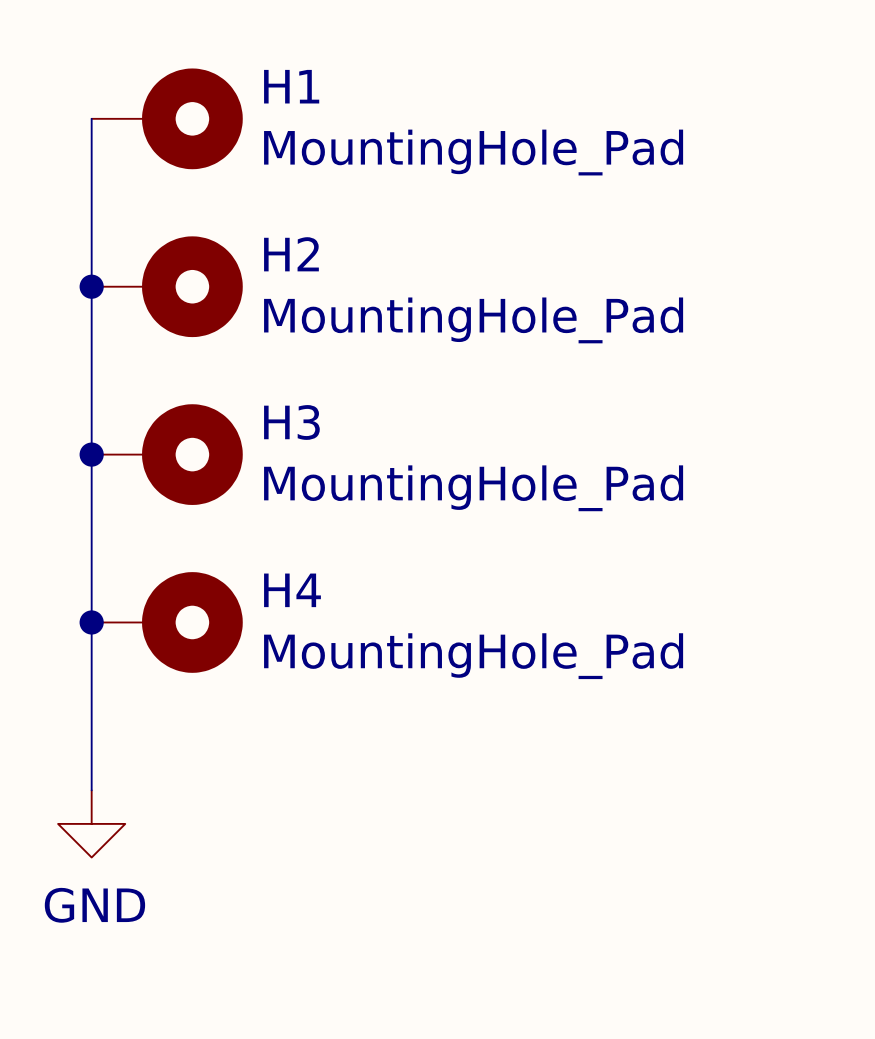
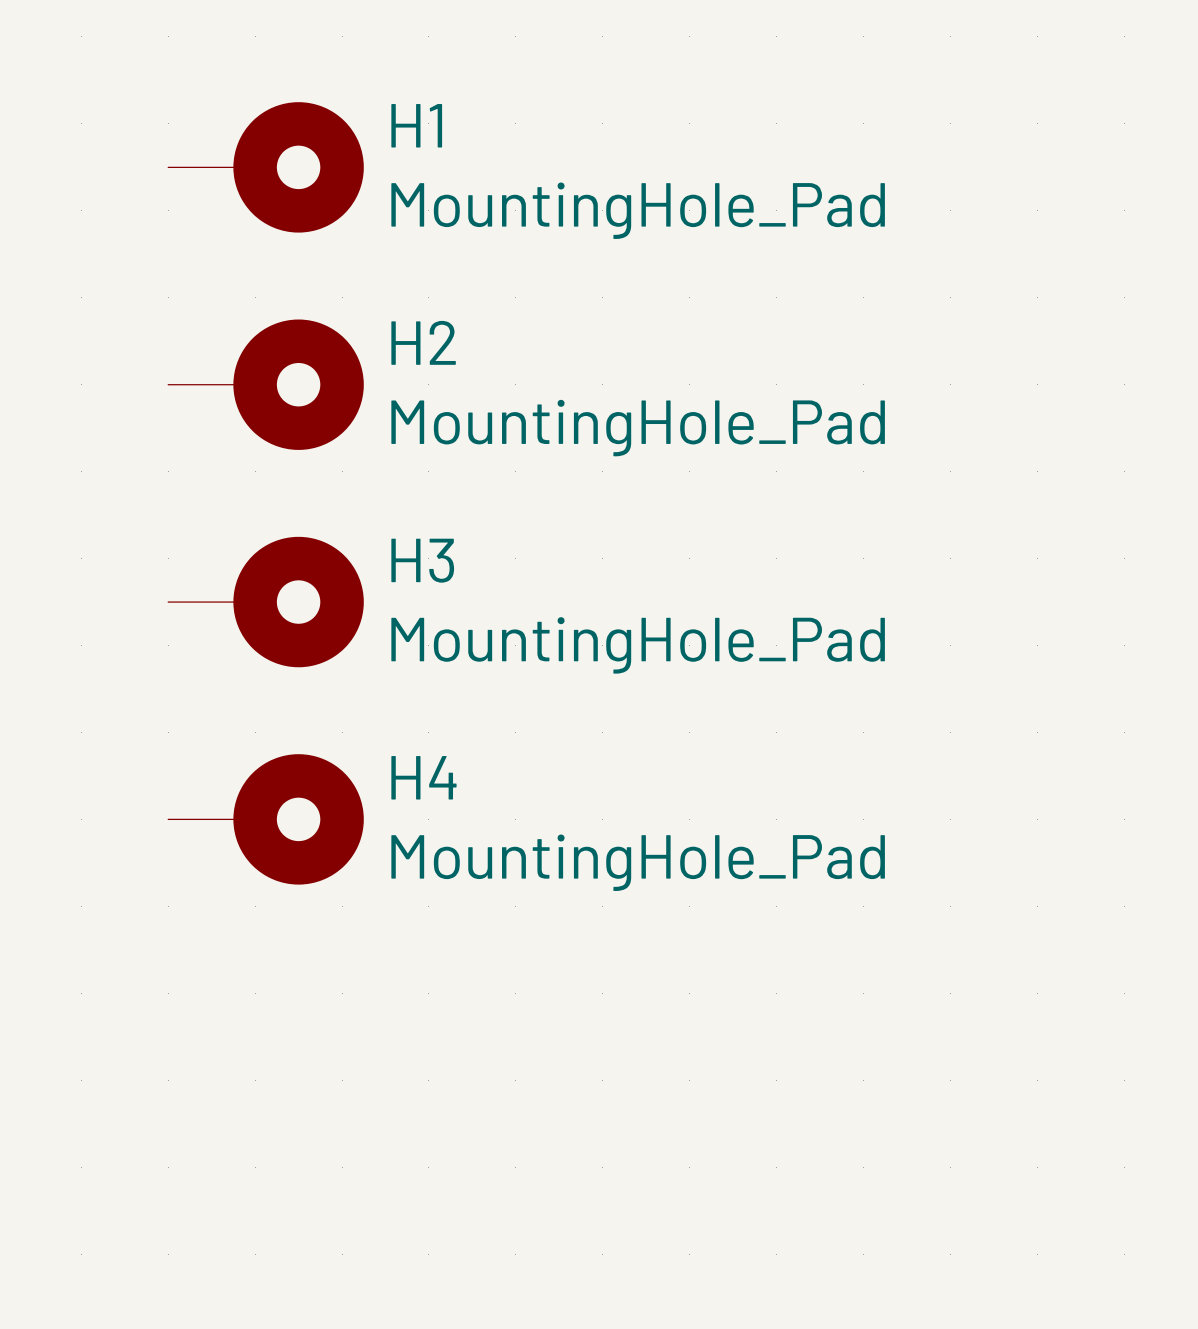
wire: (91, 118) (91, 790) -> none
junction: (91, 286) -> none
junction: (91, 454) -> none
junction: (91, 622) -> none
power symbol: GND (91, 823) -> none

